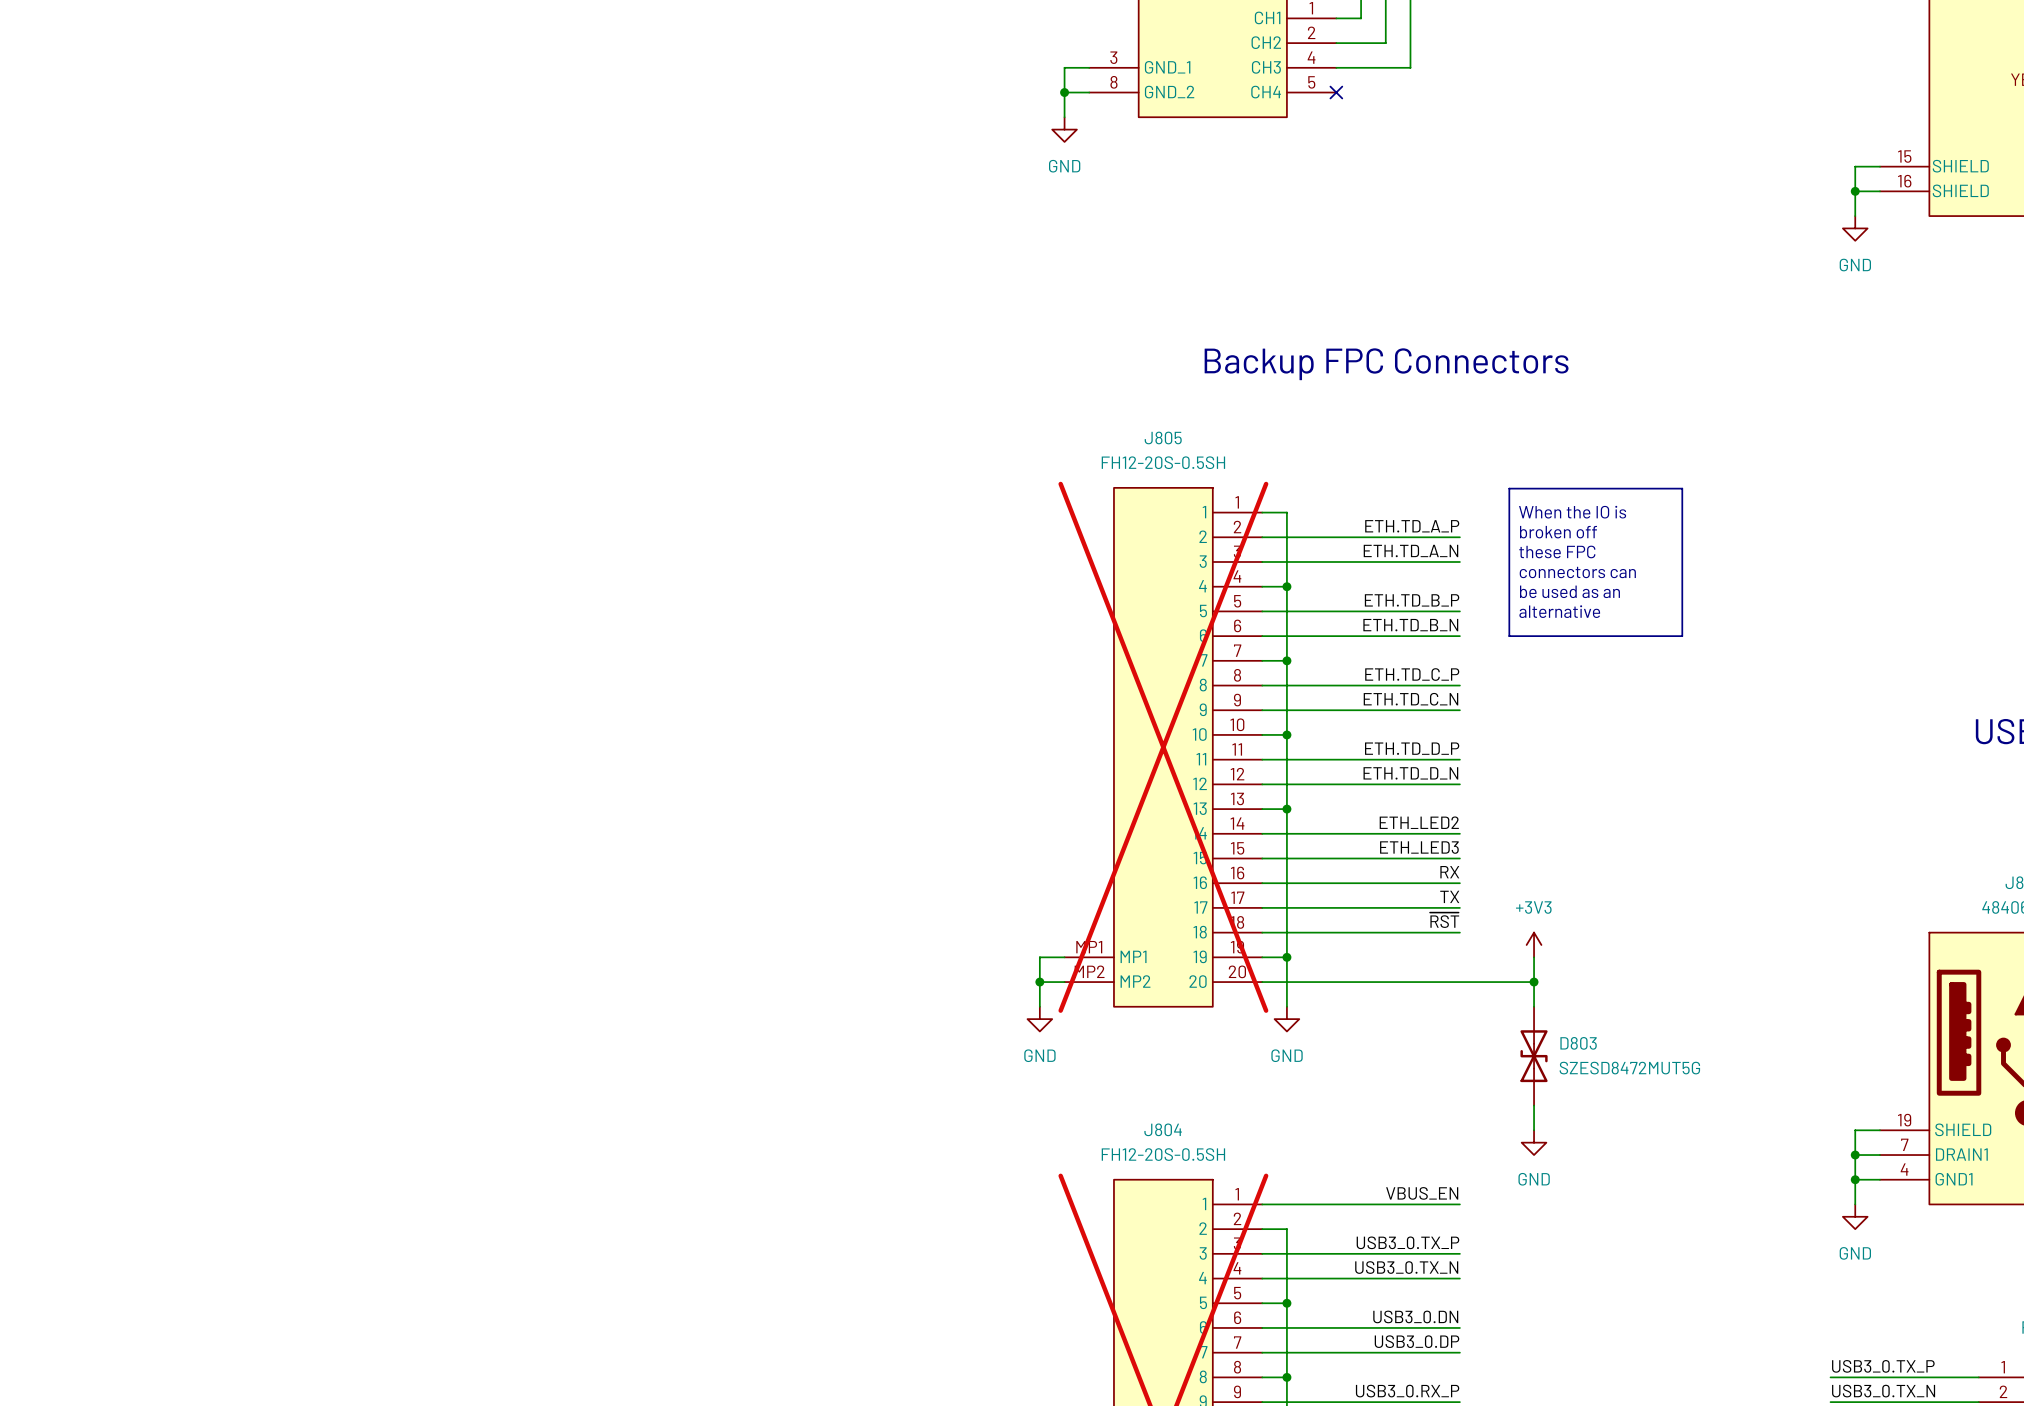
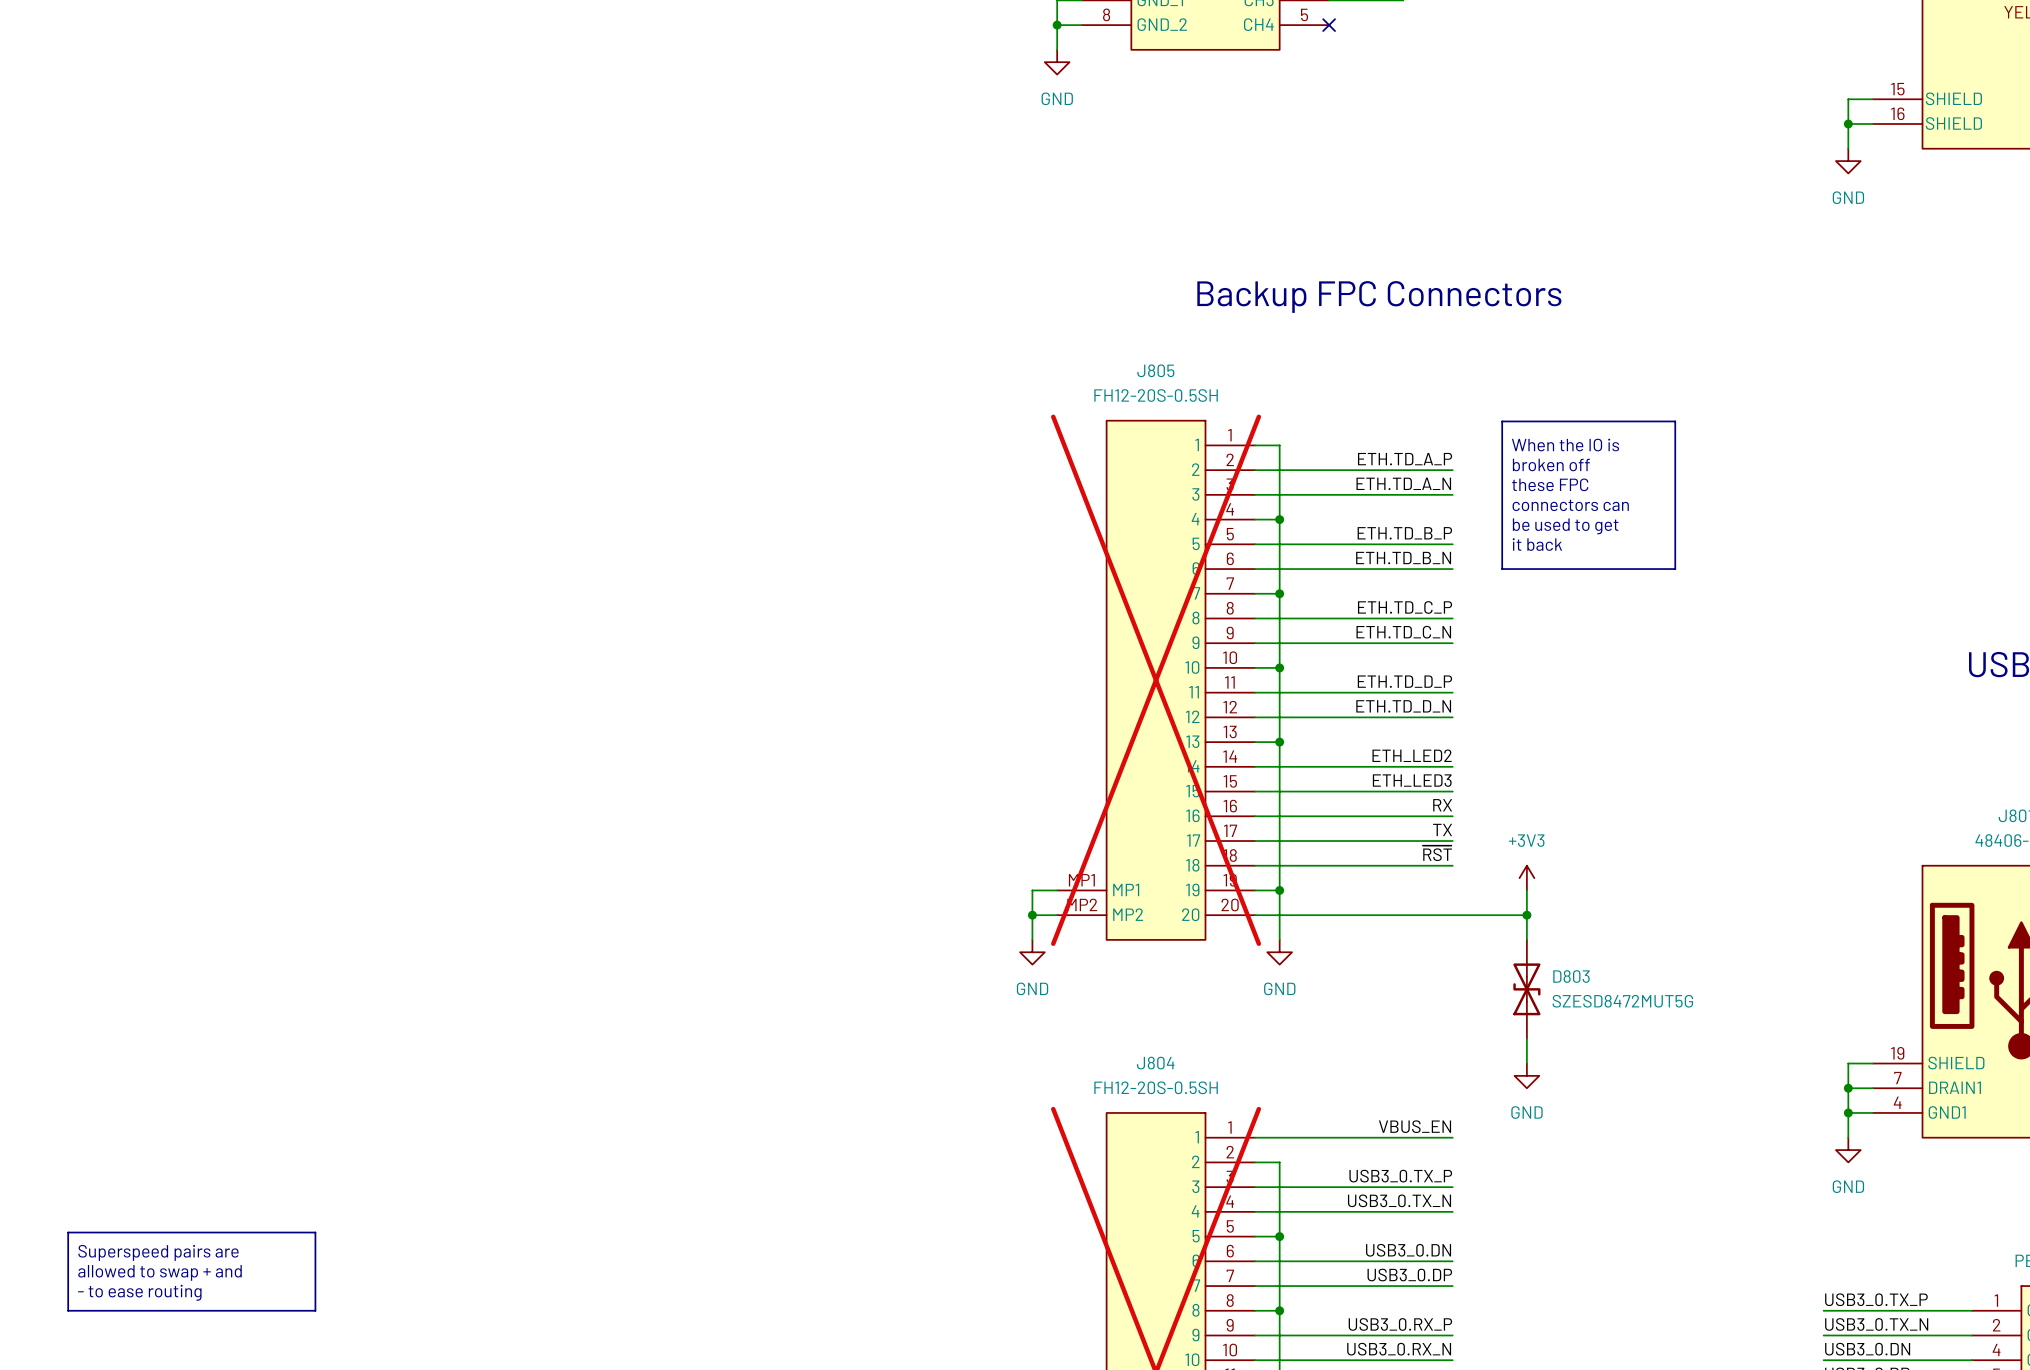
text: be used as an (1569, 591) -> be used to get (1565, 526)
text: alternative (1559, 611) -> it back (1537, 544)
line: none -> (68, 1232) (315, 1232) (315, 1310) (68, 1310) (68, 1232)
text: none -> Superspeed pairs are (158, 1252)
text: none -> allowed to swap + and (160, 1272)
text: none -> - to ease routing (139, 1292)

